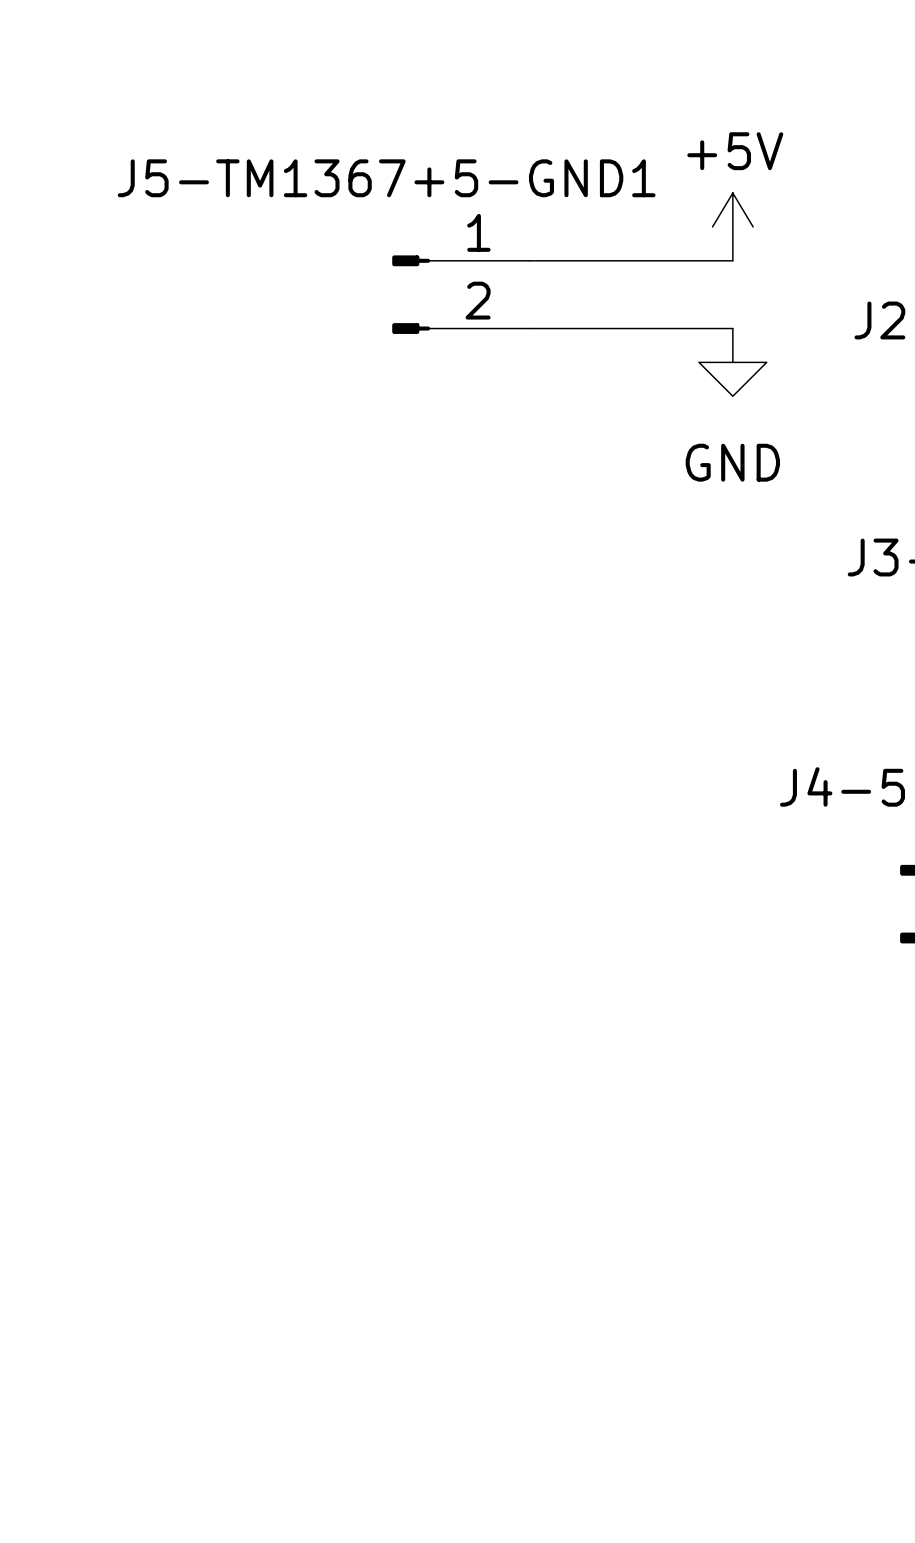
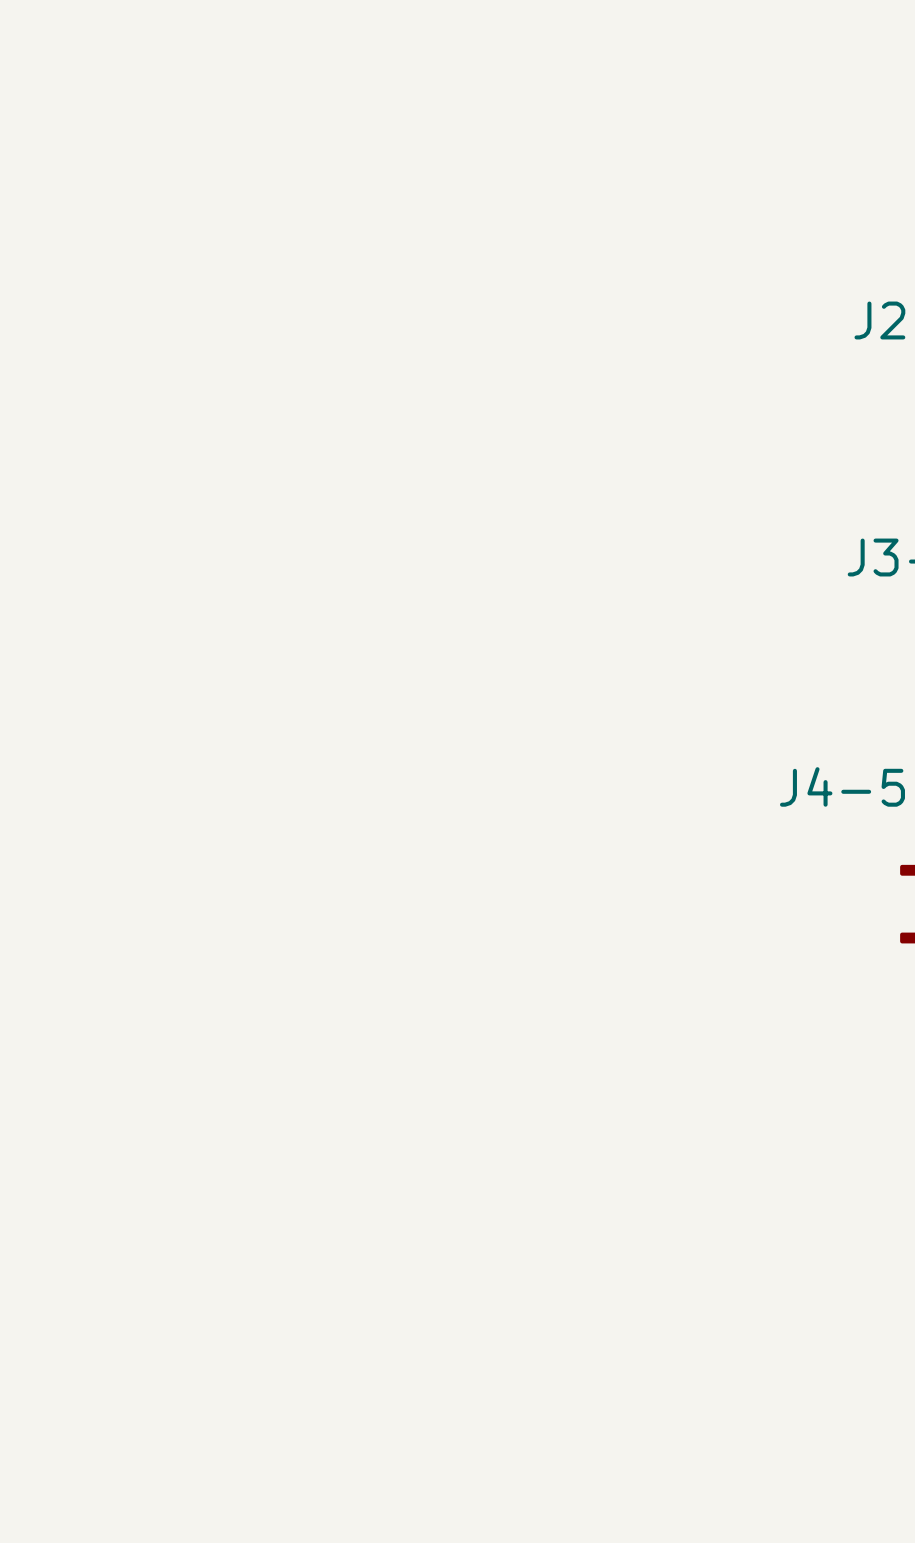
power symbol: +5V (732, 226) -> none
wire: (529, 260) (732, 260) -> none
J5-TM1367+5-GND1: (460, 294) -> none
wire: (529, 328) (732, 328) -> none
power symbol: GND (732, 362) -> none

